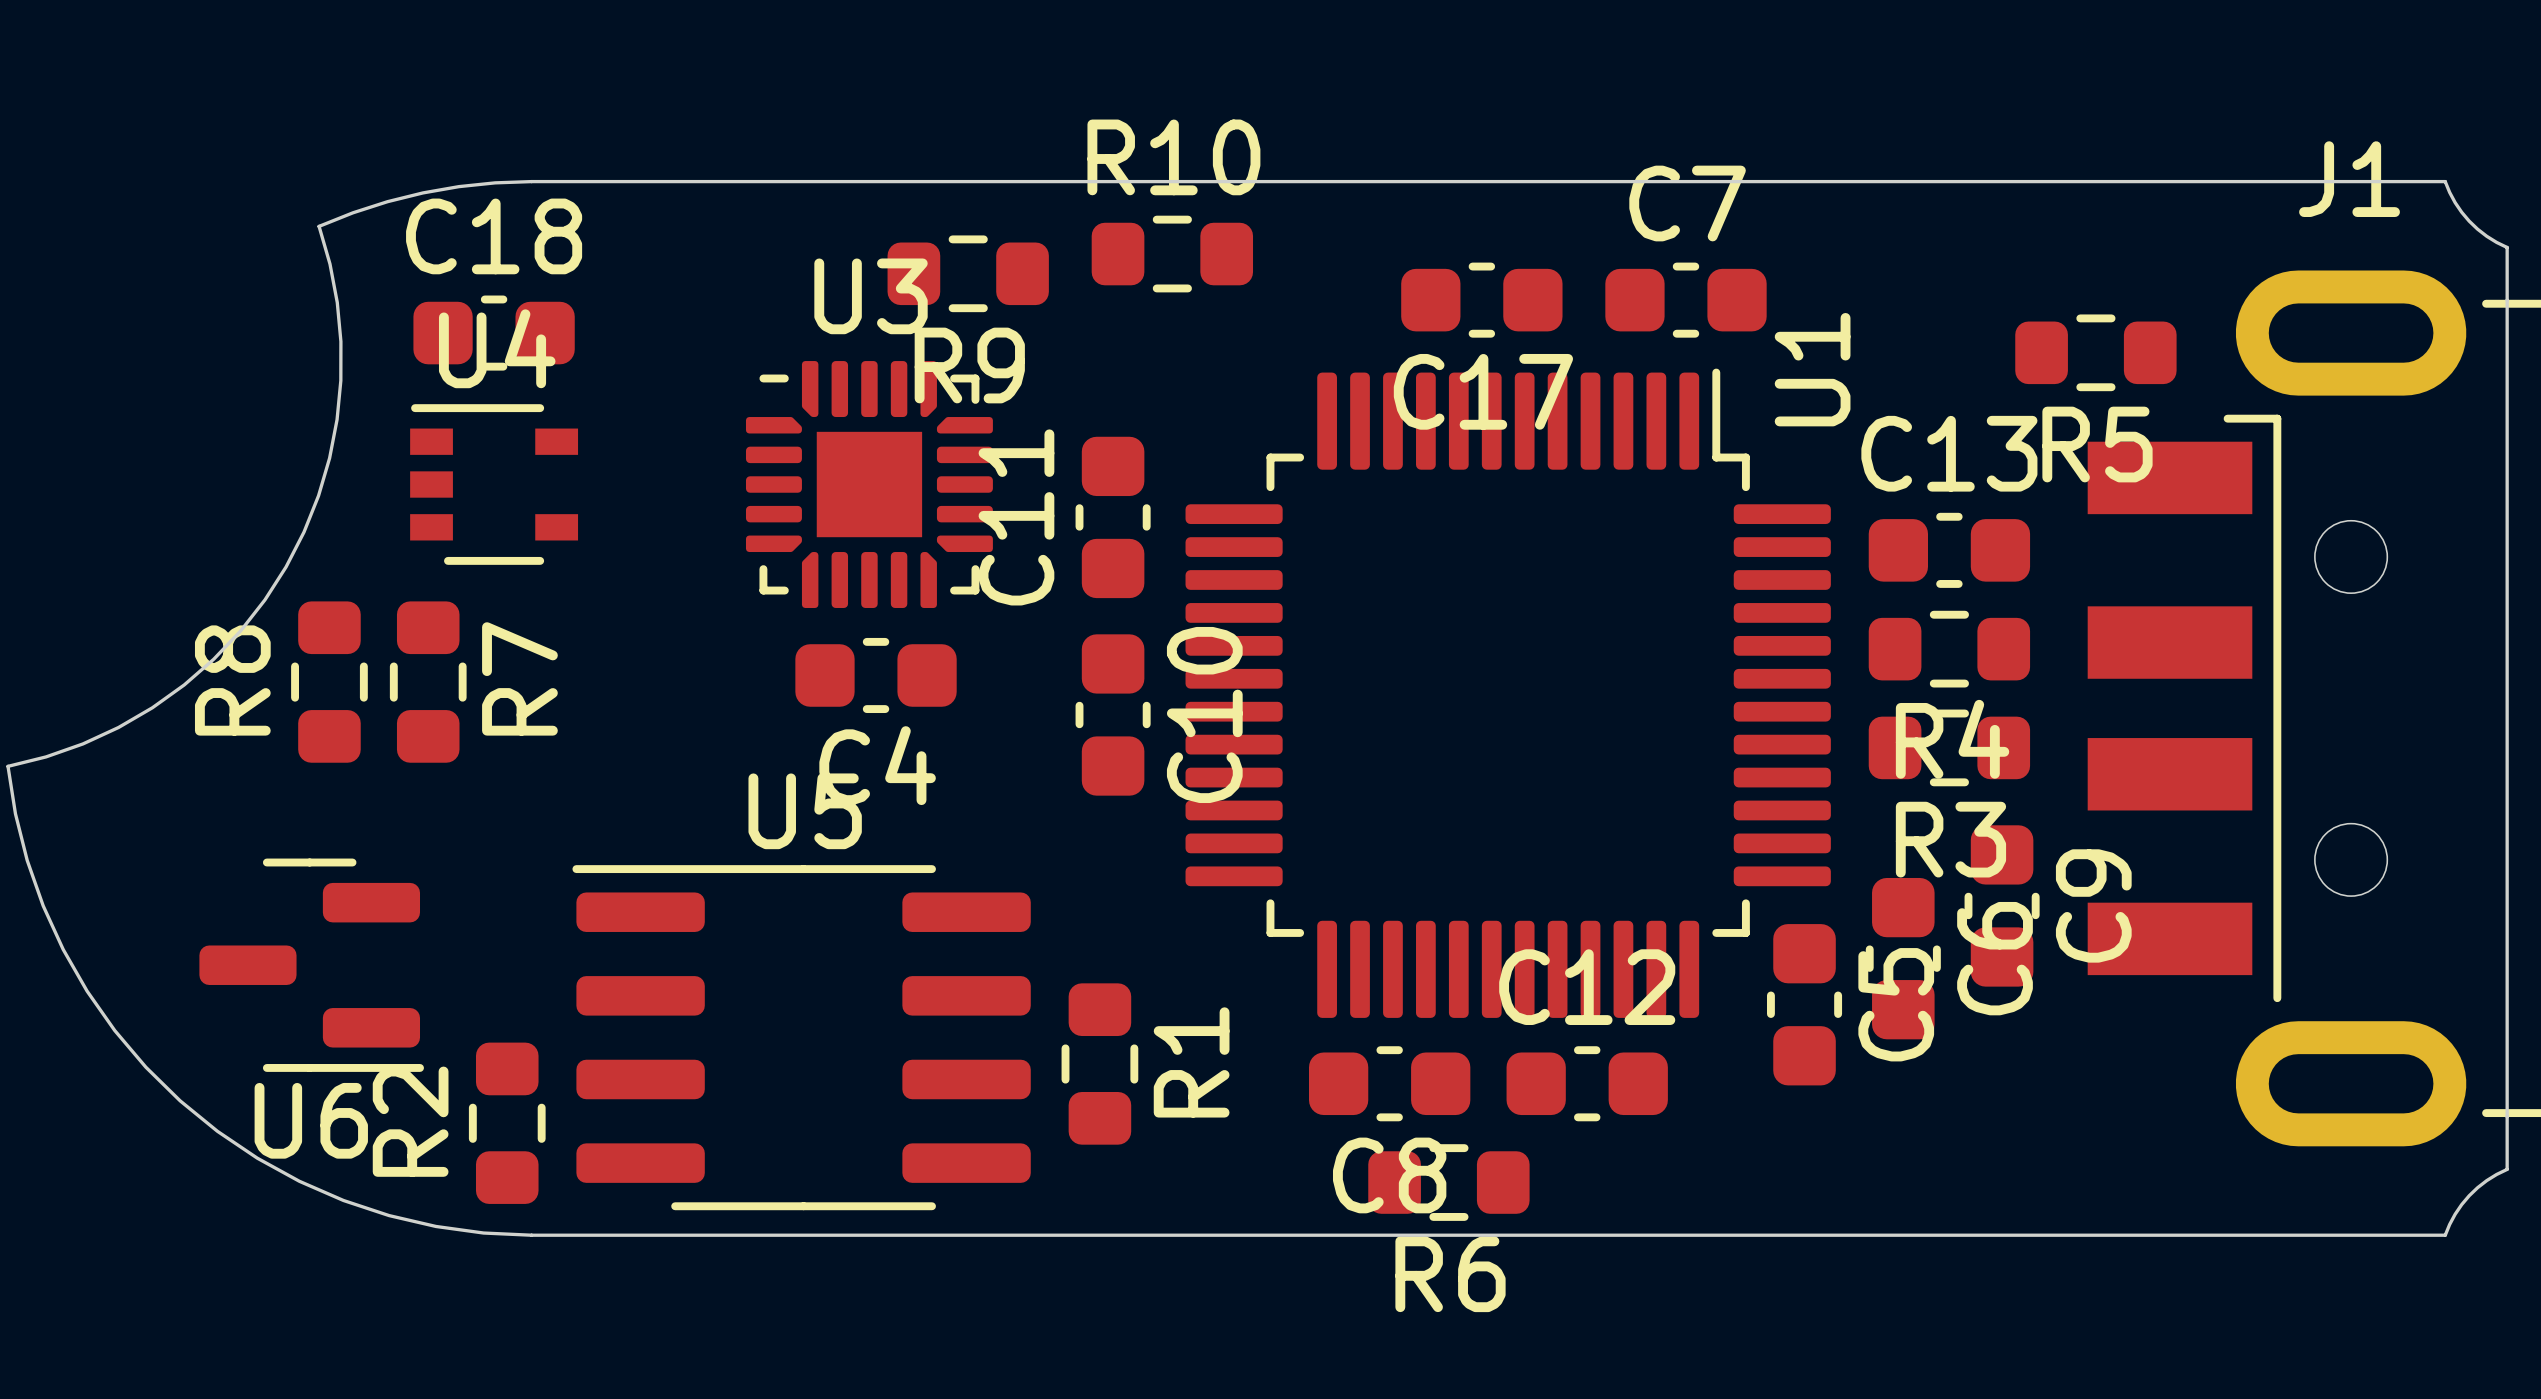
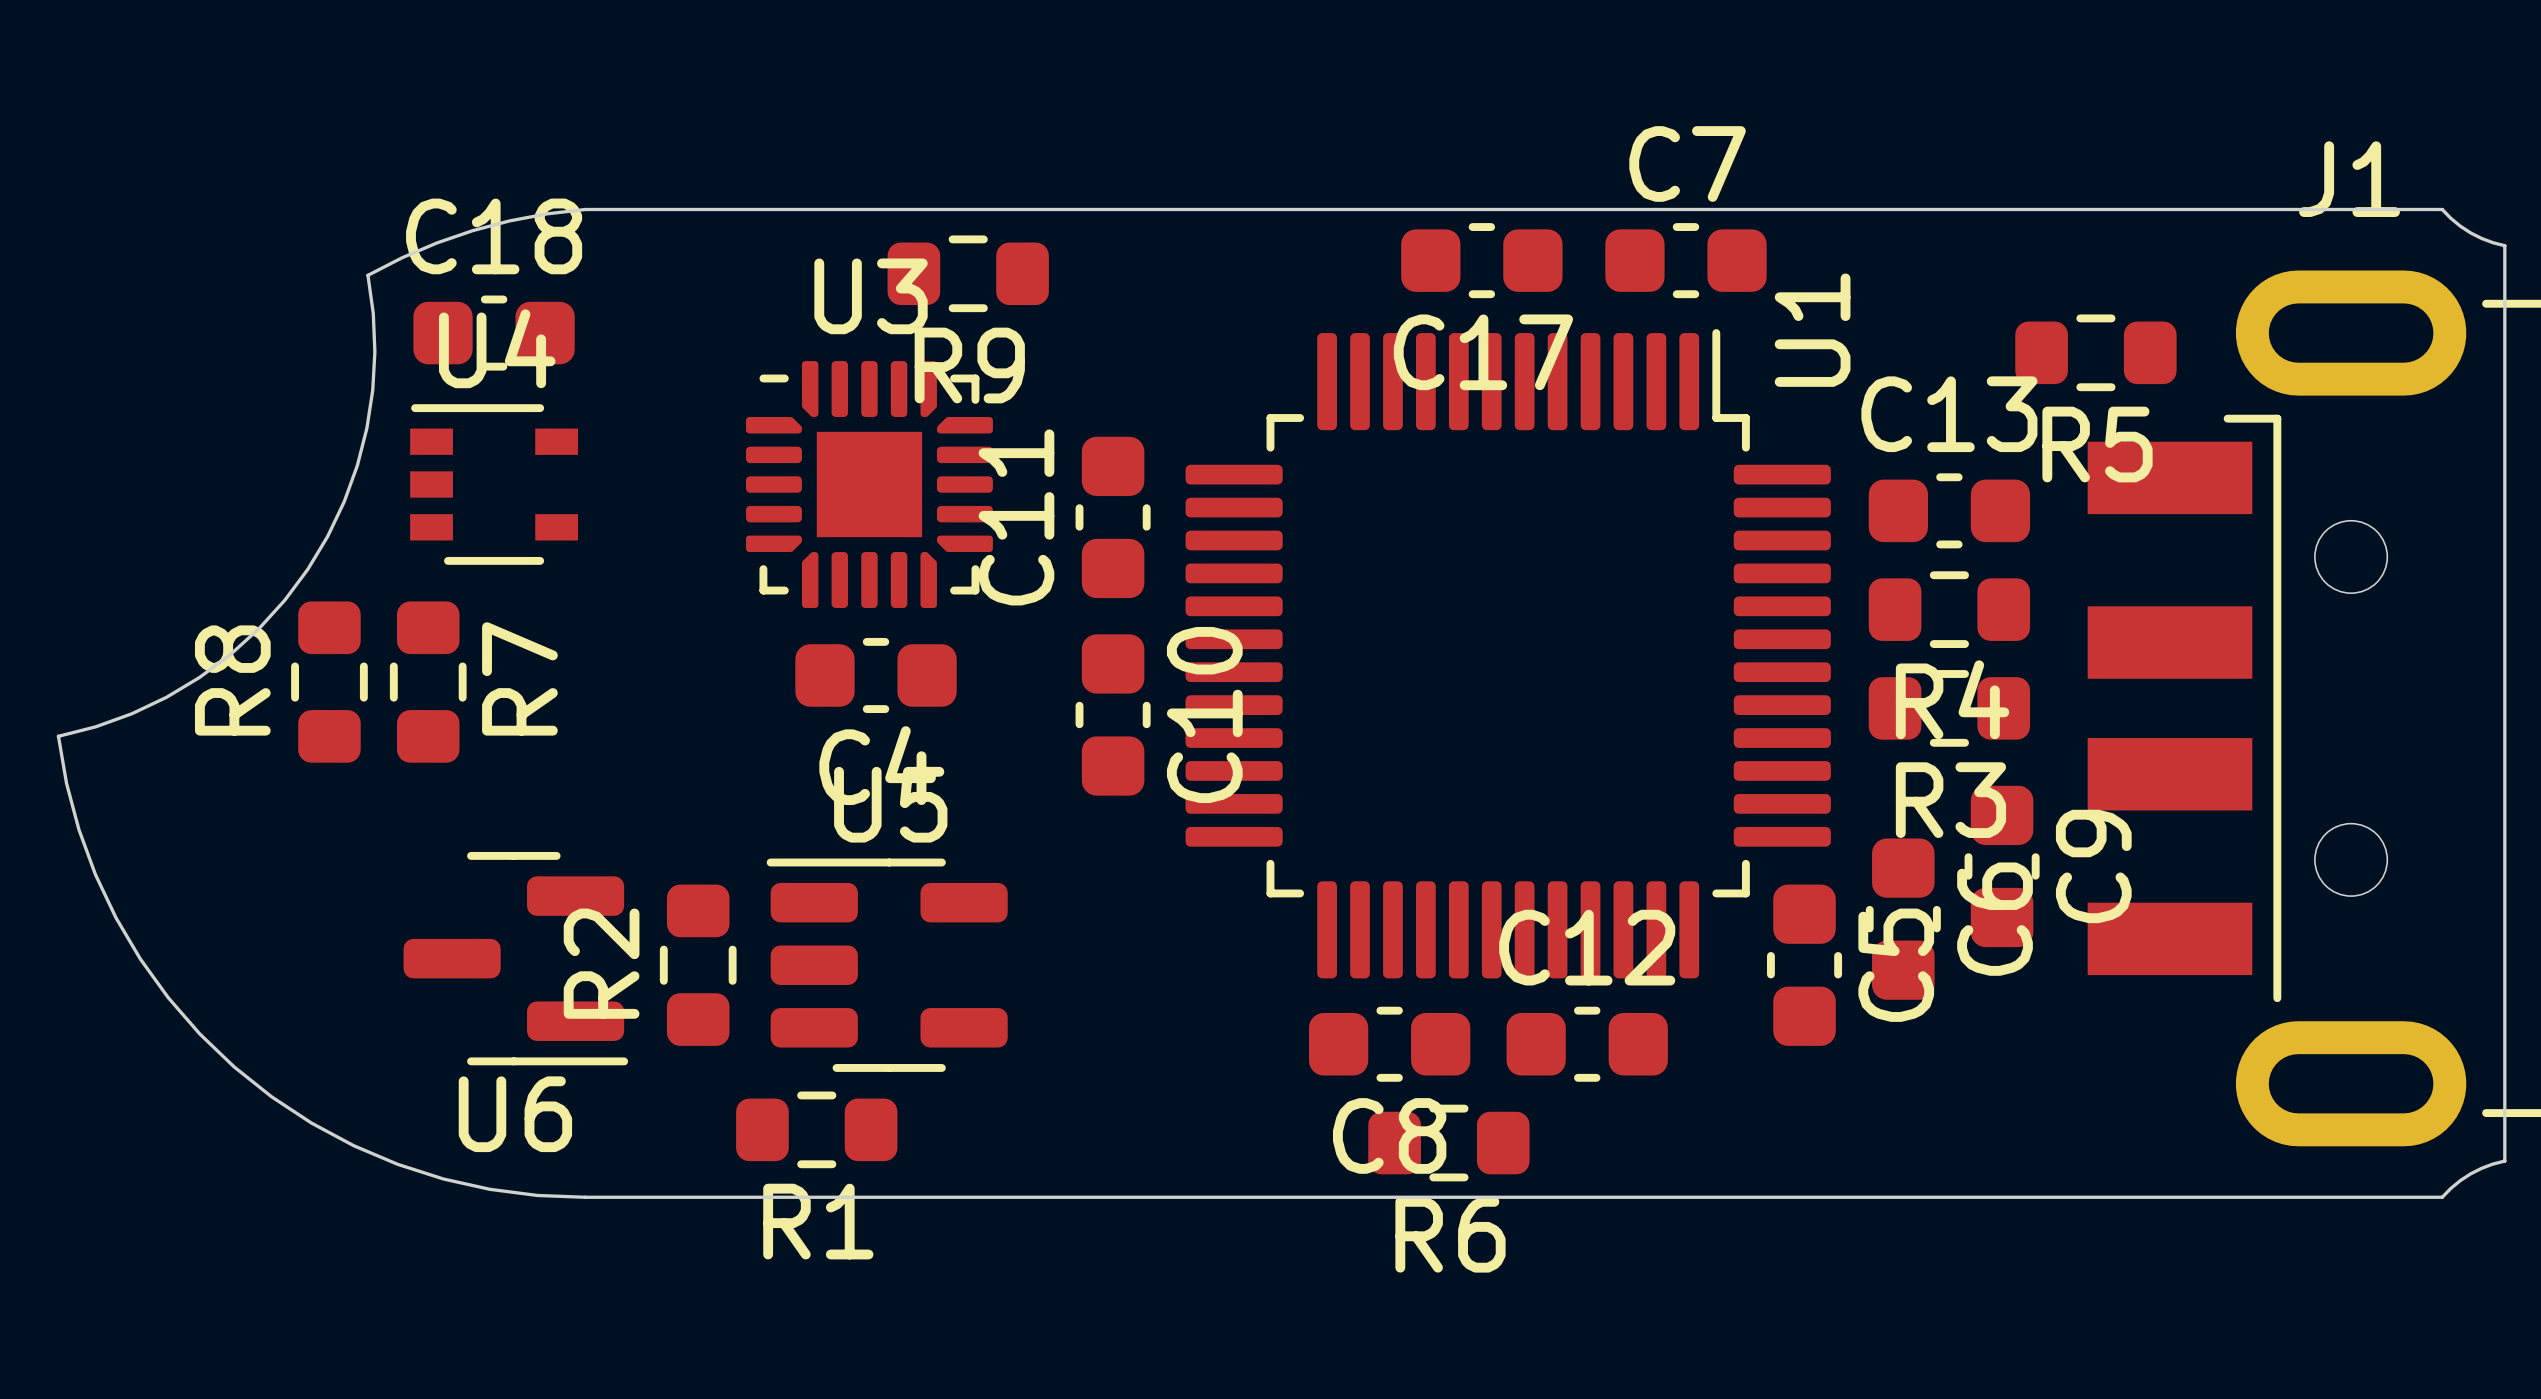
board edge: (531, 181) (2445, 181) (2455, 202) (2469, 221) (2486, 236) (2507, 247) (2507, 1169) (2486, 1180) (2469, 1195) (2455, 1214) (2445, 1235) (531, 1235) (483, 1233) (435, 1226) (389, 1215) (343, 1200) (299, 1181) (257, 1158) (217, 1131) (180, 1100) (145, 1067) (114, 1030) (87, 991) (63, 949) (43, 905) (27, 860) (15, 813) (8, 766) (46, 756) (83, 743) (118, 727) (152, 707) (184, 684) (213, 659) (240, 630) (264, 599) (286, 566) (304, 532) (318, 495) (329, 458) (337, 419) (340, 380) (340, 341) (337, 302) (329, 264) (319, 226) (352, 212) (423, 192) (458, 186) (531, 181) -> (585, 209) (509, 220) (473, 230) (401, 257) (367, 275) (373, 313) (374, 351) (372, 390) (366, 428) (357, 465) (344, 501) (327, 536) (307, 569) (284, 600) (258, 628) (230, 654) (199, 677) (166, 697) (131, 713) (95, 726) (58, 736) (66, 783) (78, 829) (95, 874) (115, 917) (140, 958) (168, 997) (199, 1033) (234, 1066) (271, 1096) (311, 1123) (353, 1145) (397, 1164) (443, 1178) (490, 1189) (537, 1195) (585, 1197) (2442, 1197) (2470, 1173) (2504, 1161) (2504, 245) (2470, 232) (2442, 209) (585, 209)
R10: (1172, 254) -> none
C17 position: (1481, 300) -> (1481, 260)
C7 position: (1685, 300) -> (1685, 260)
C13 position: (1949, 550) -> (1949, 510)
R4 position: (1949, 649) -> (1949, 609)
U1 position: (1508, 693) -> (1508, 653)
R3 position: (1949, 747) -> (1949, 708)
U5 footprint: [572, 865, 1031, 1211] -> [766, 858, 1008, 1072]
C9 position: (2002, 905) -> (2002, 866)
C6 position: (1903, 958) -> (1903, 919)
U6 position: (311, 965) -> (515, 958)
C5 position: (1804, 1004) -> (1804, 965)
R1 rotation: 0° (1099, 1064) -> 90° clockwise (816, 1129)
R1 position: (1099, 1064) -> (816, 1129)
C8 position: (1389, 1083) -> (1389, 1044)
C12 position: (1587, 1083) -> (1587, 1044)
R2 position: (507, 1123) -> (698, 965)
R6 position: (1448, 1182) -> (1448, 1143)

